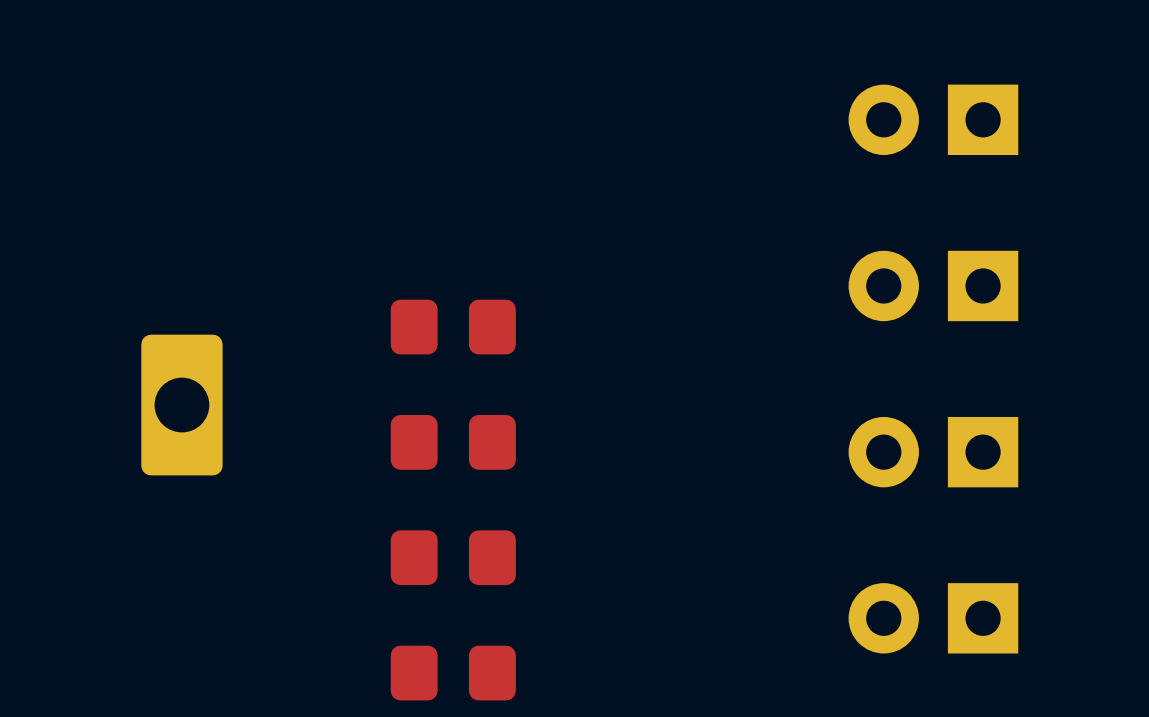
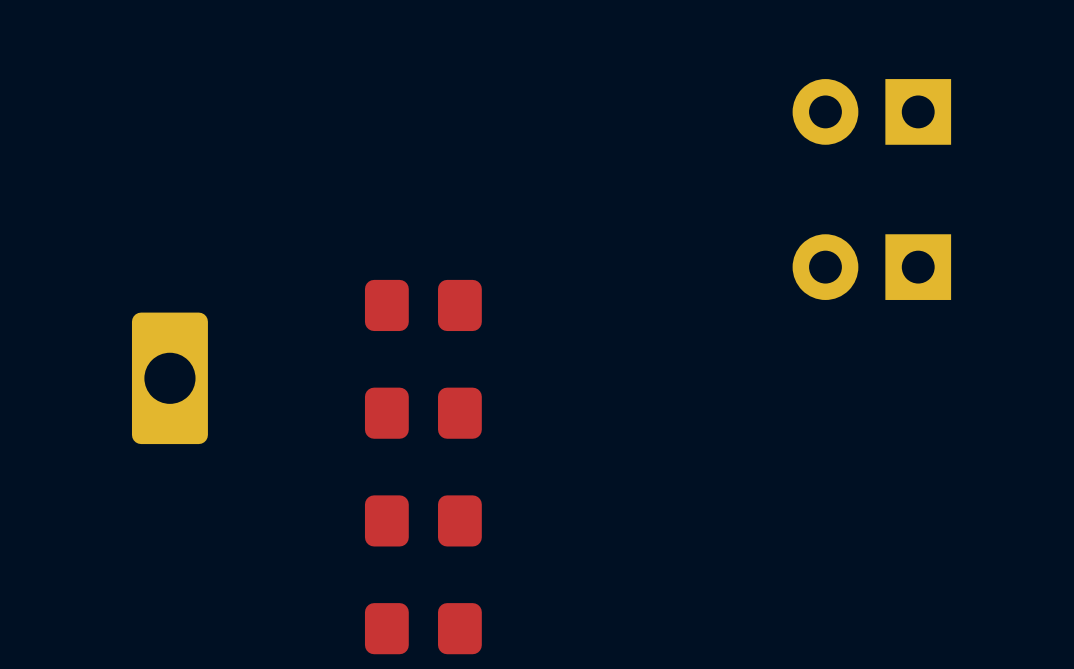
part: (933, 452) -> none
part: (933, 618) -> none

